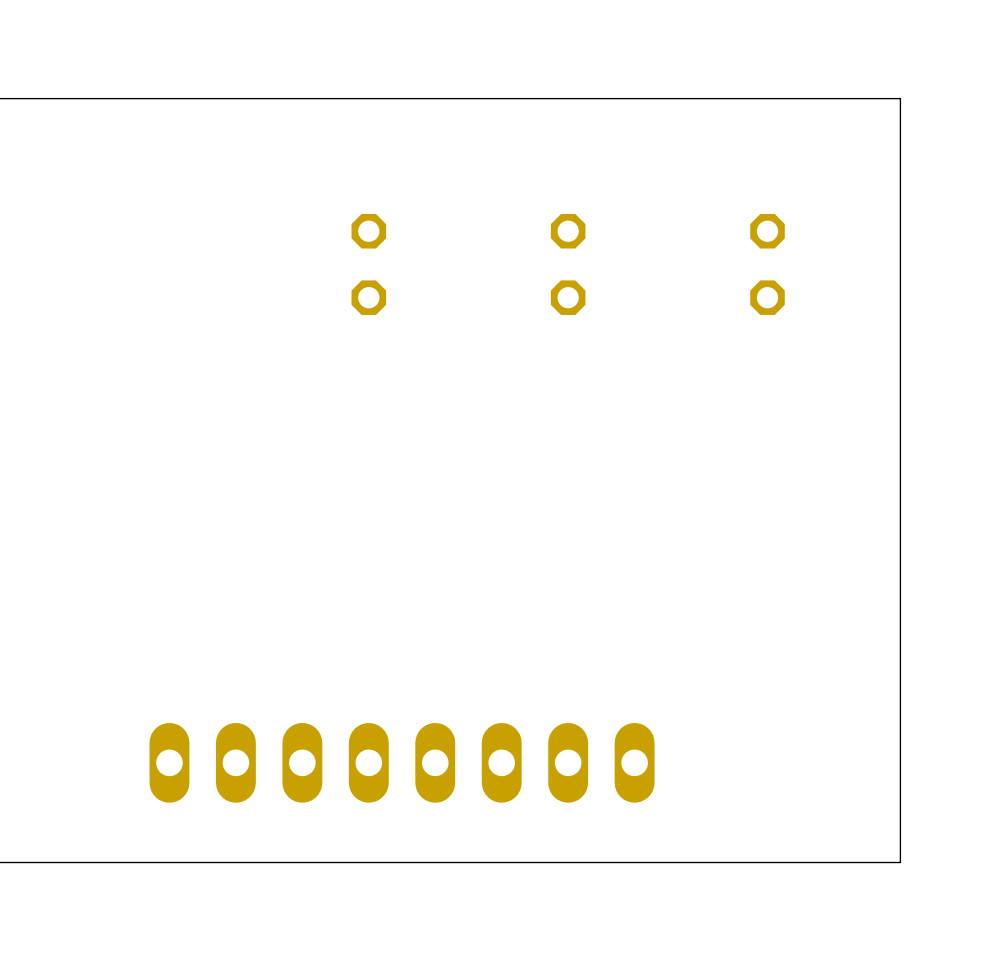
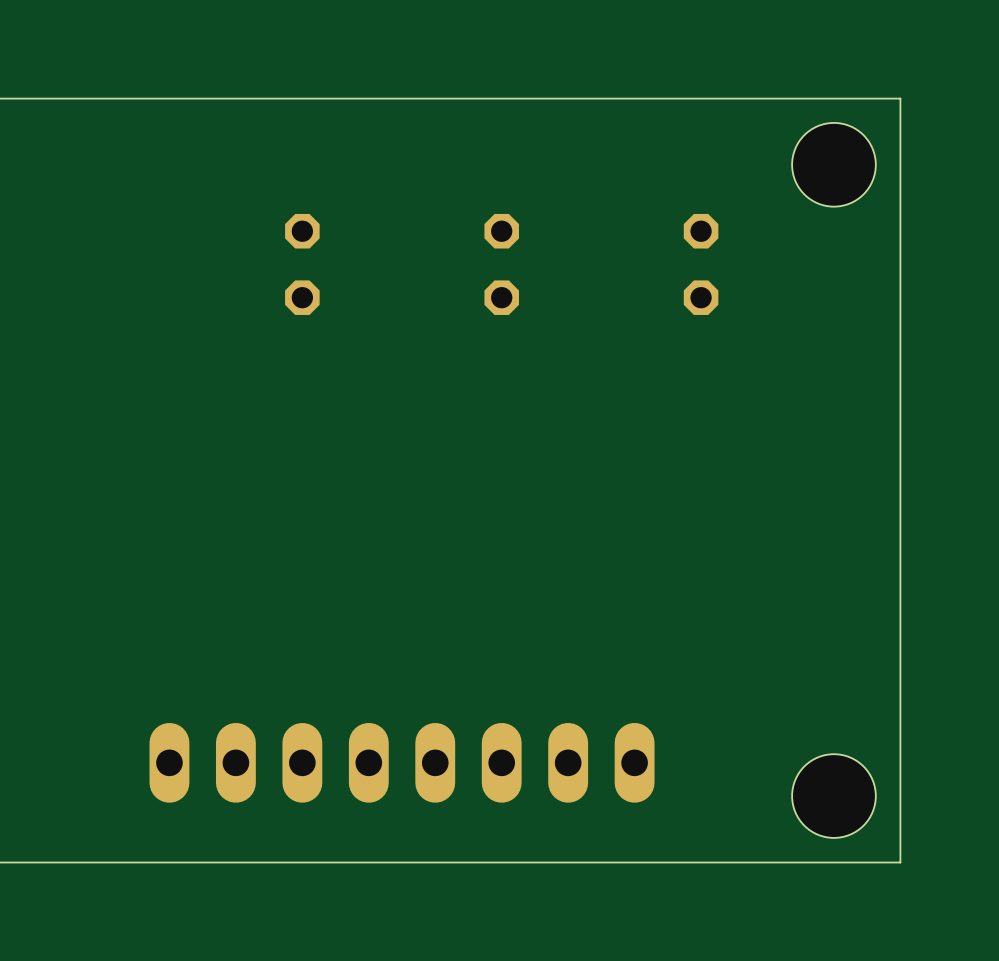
hole: none -> (833, 164)
part: none -> (302, 264)
part: (368, 264) -> none
part: none -> (501, 264)
part: (568, 264) -> none
part: none -> (701, 264)
part: (767, 264) -> none
hole: none -> (833, 796)

